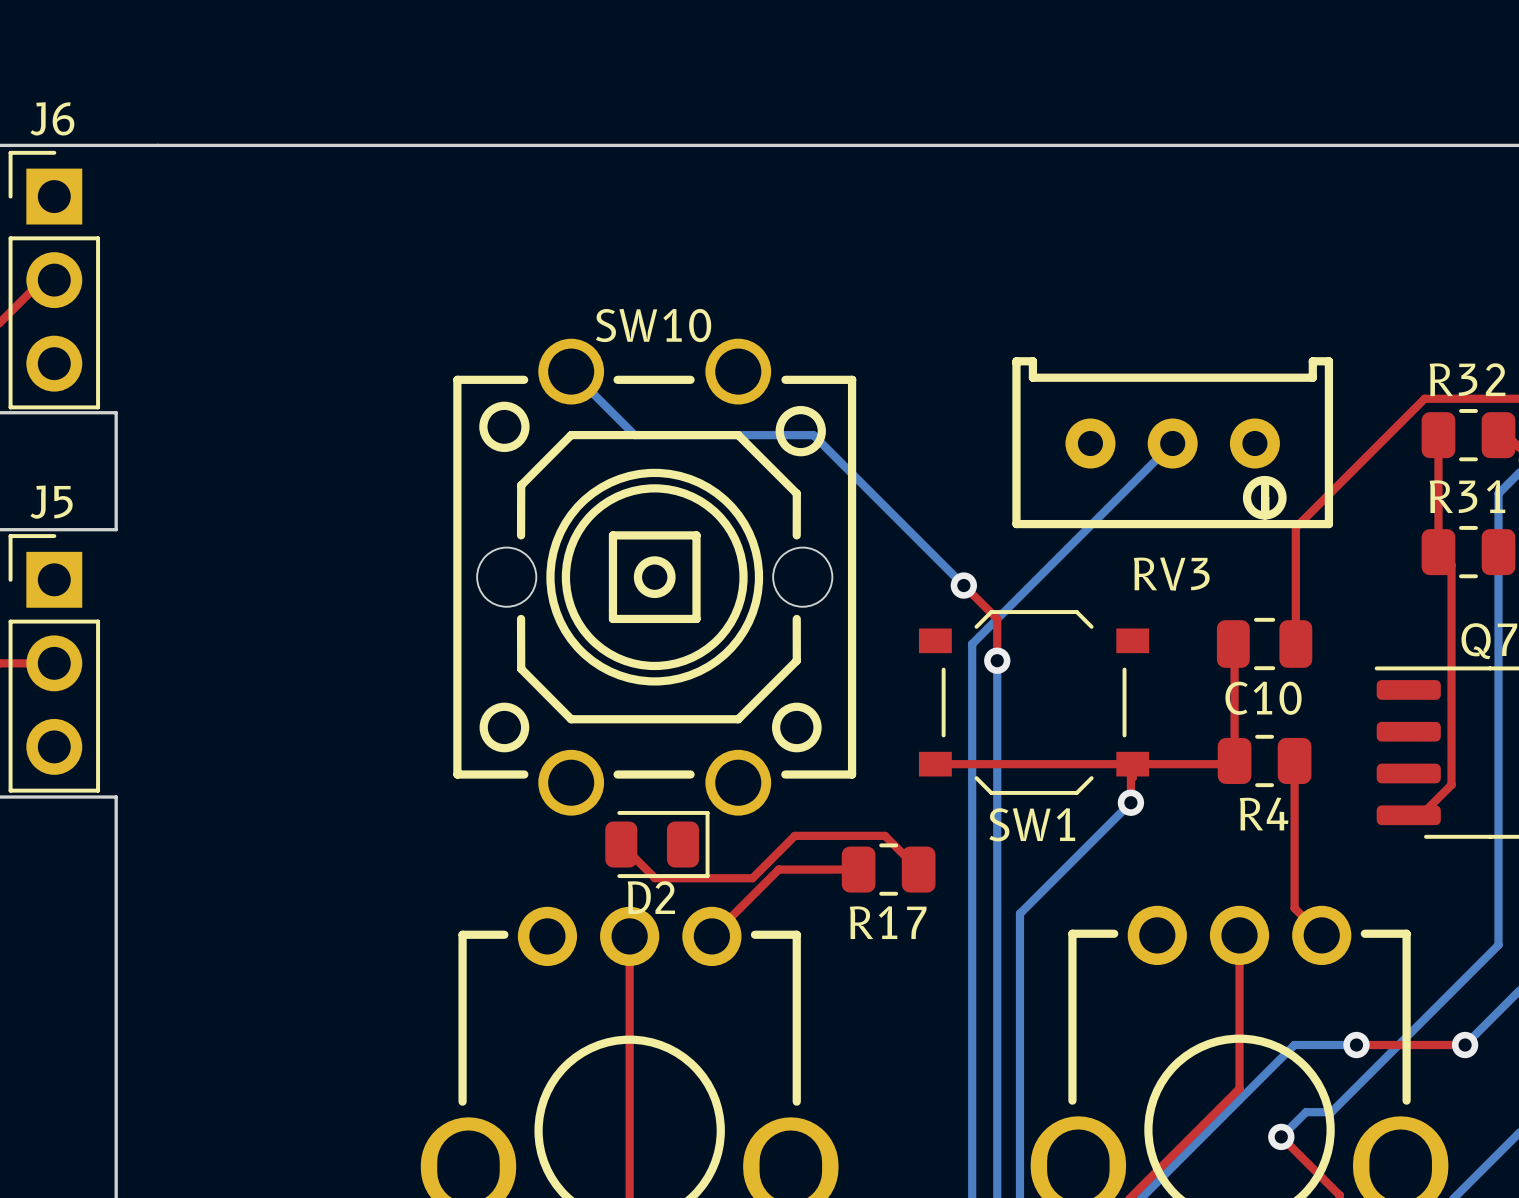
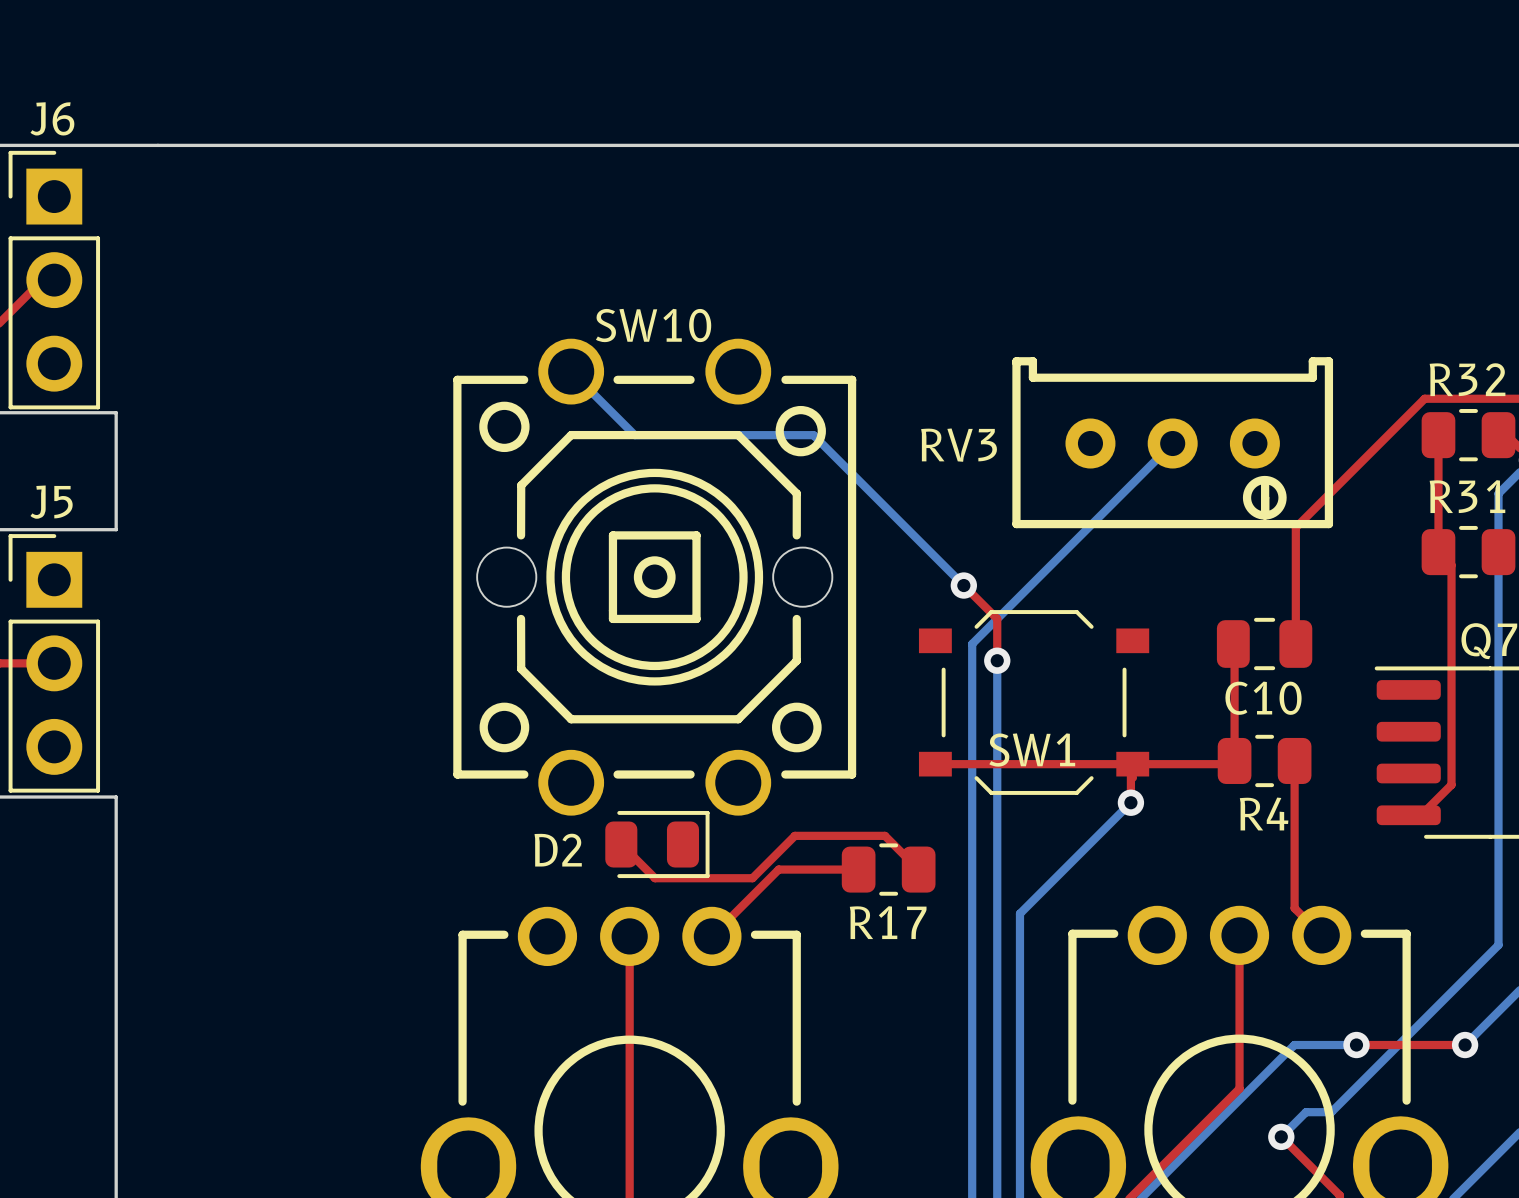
RV3 name position: RV3 (1171, 574) -> RV3 (959, 445)
SW1 name position: SW1 (1032, 824) -> SW1 (1032, 750)
D2 name position: D2 (651, 897) -> D2 (558, 850)

